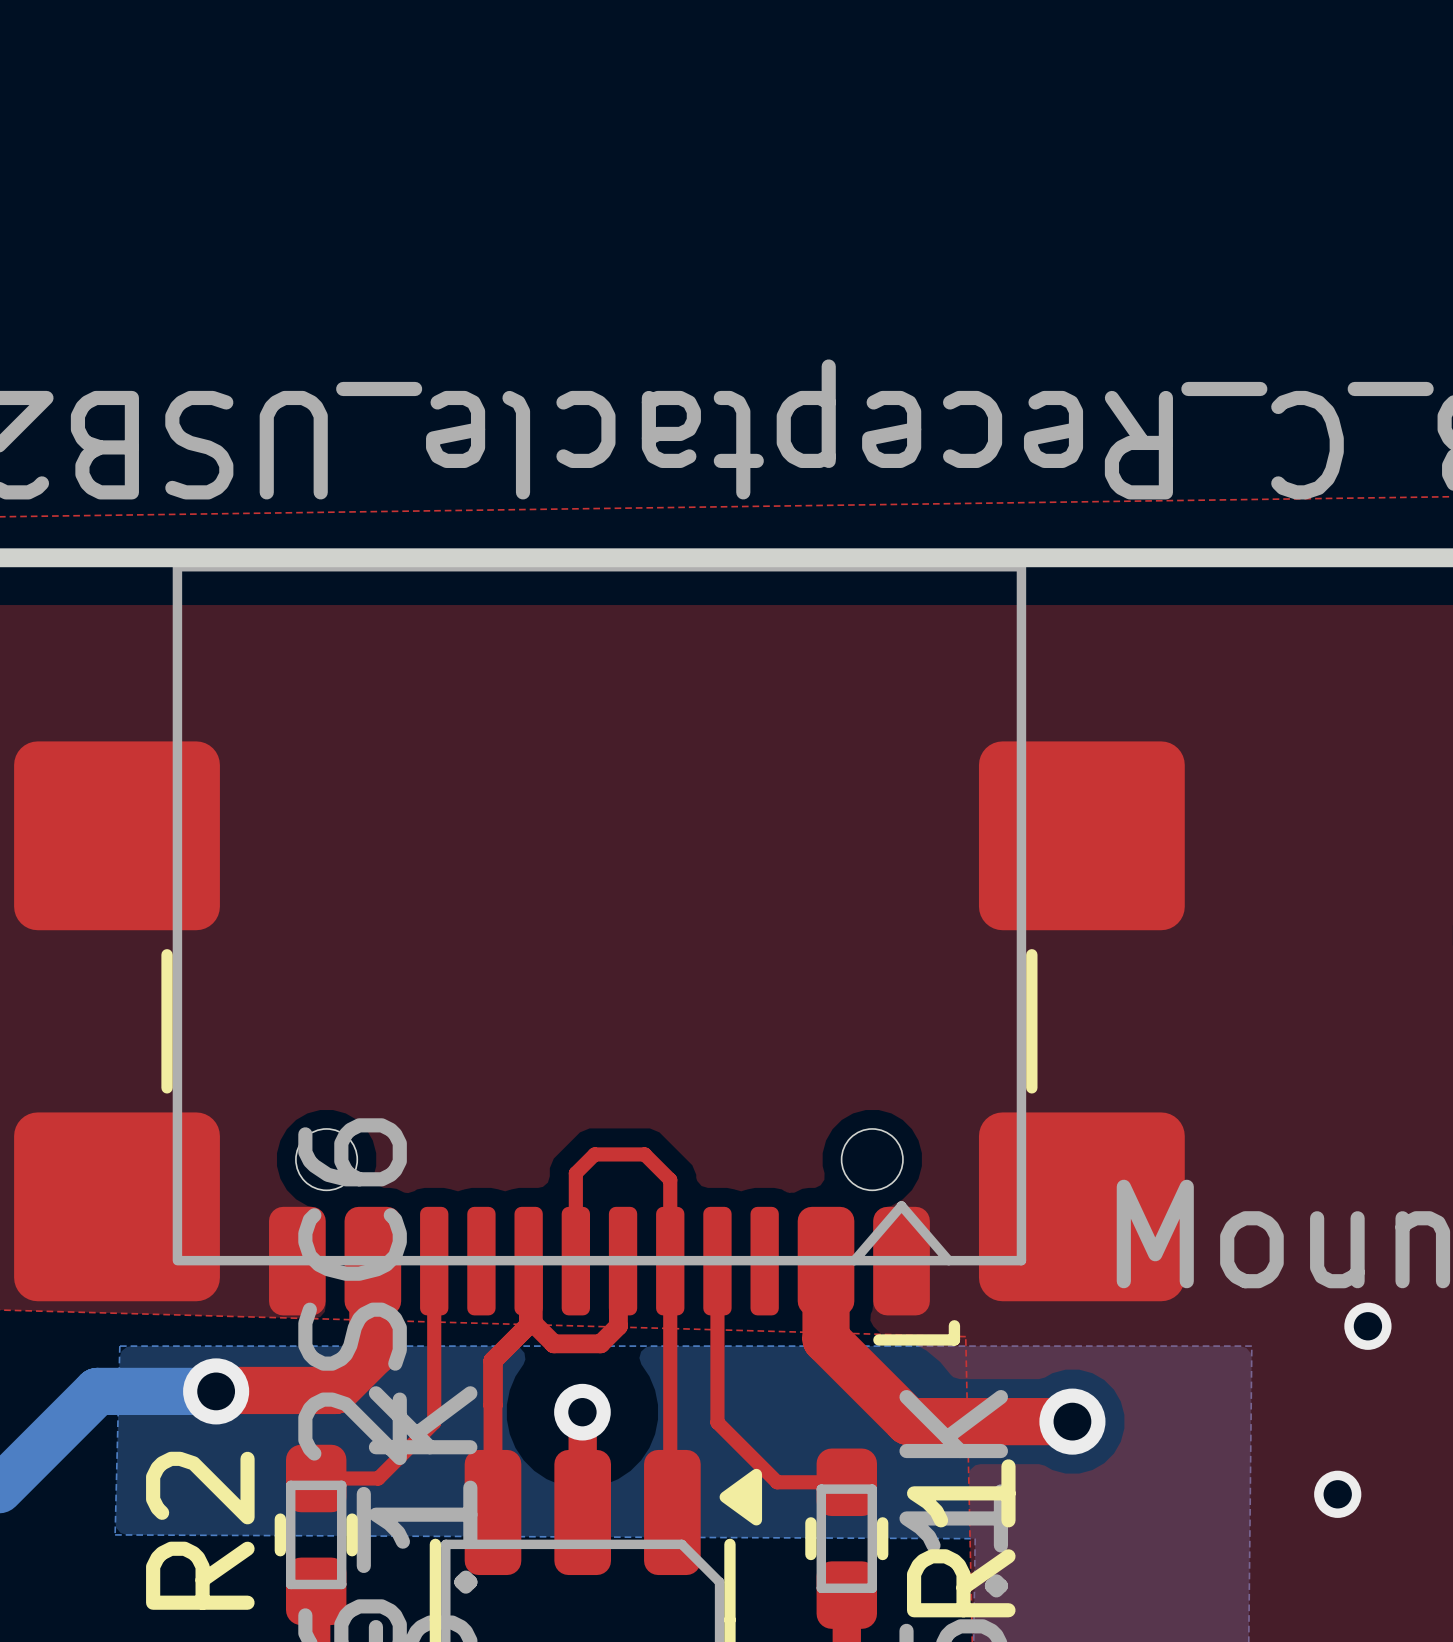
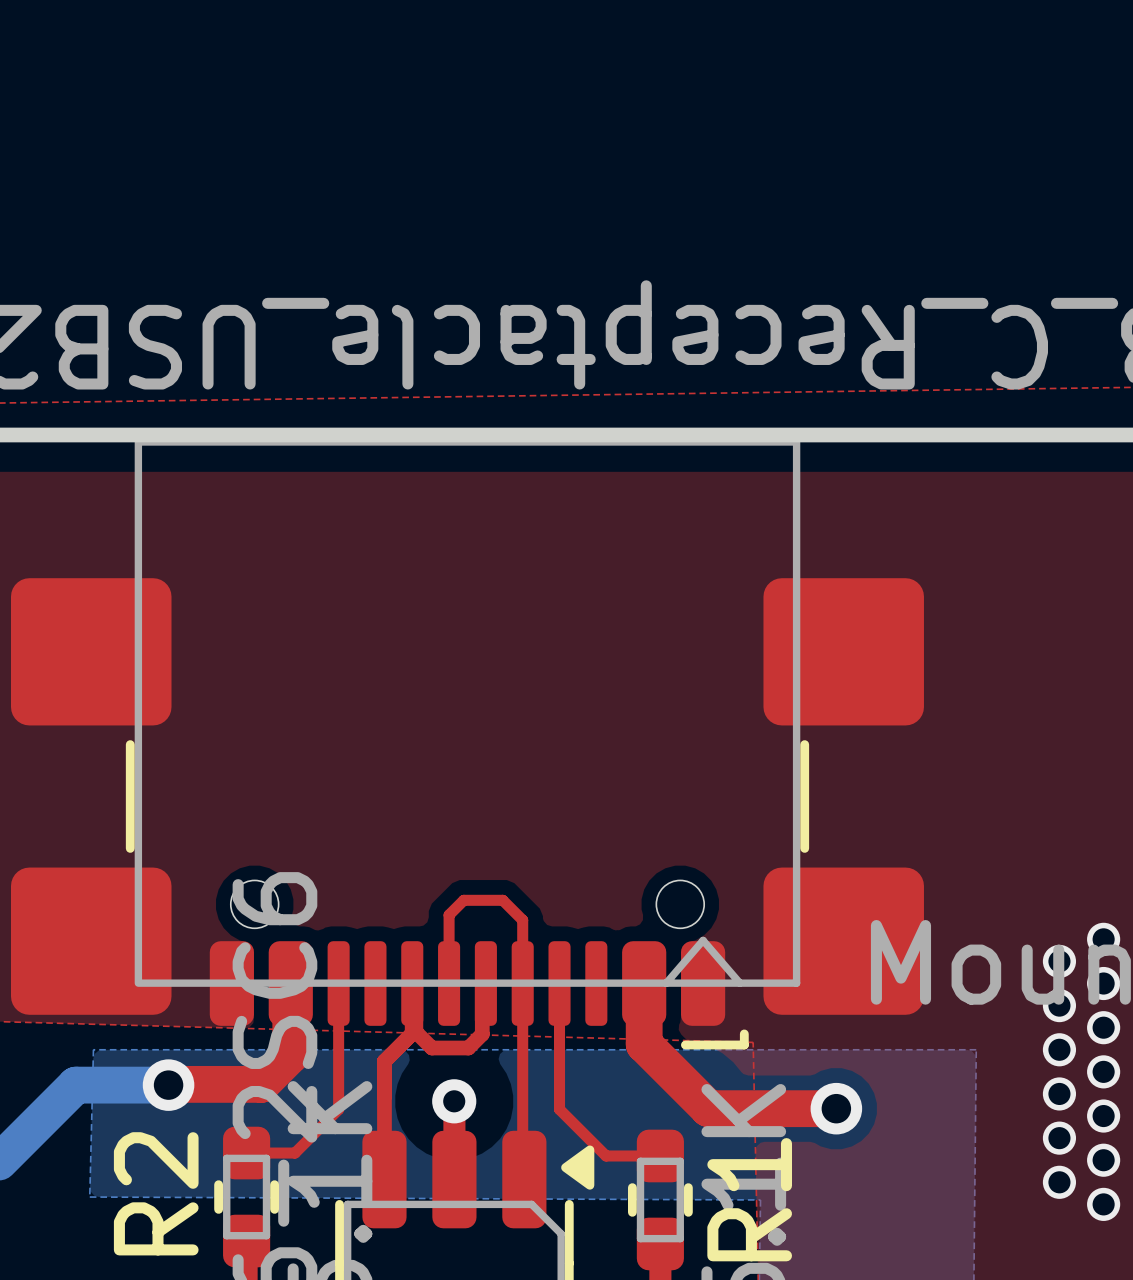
via: none -> (1103, 939)
via: none -> (1059, 961)
via: none -> (1103, 983)
via: none -> (1059, 1005)
via: none -> (1103, 1027)
via: (1367, 1326) -> none
via: none -> (1059, 1049)
via: none -> (1103, 1071)
via: none -> (1059, 1093)
via: none -> (1103, 1116)
via: none -> (1059, 1138)
via: none -> (1103, 1160)
via: (1337, 1494) -> none
via: none -> (1059, 1182)
via: none -> (1103, 1204)

